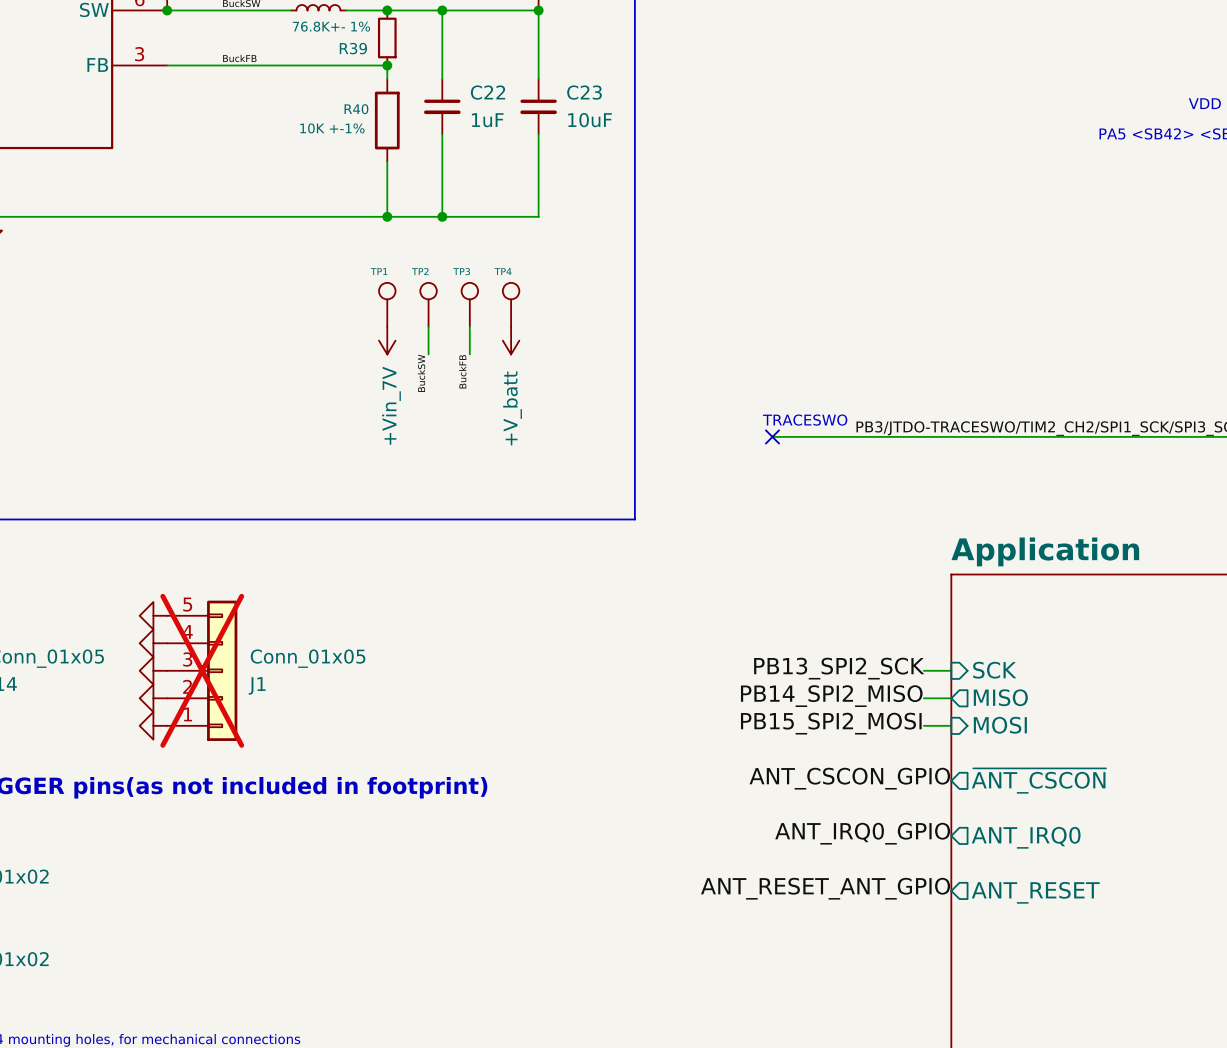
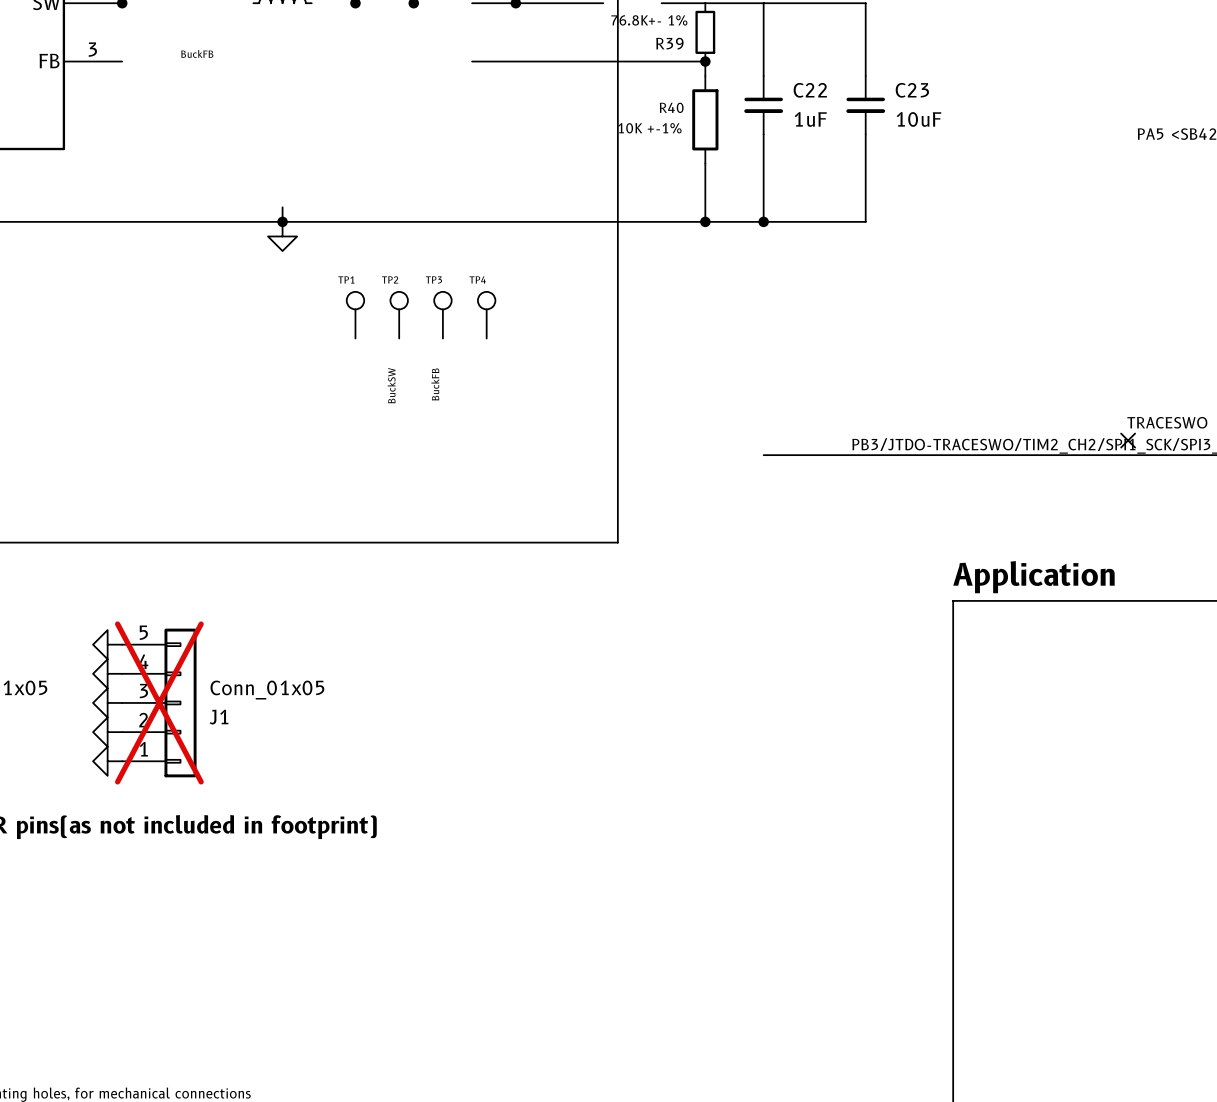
wire: (167, 10) (290, 10) -> none
wire: (346, 10) (497, 10) -> none
wire: (442, 10) (442, 79) -> none
wire: (538, 10) (538, 79) -> (515, 3) (603, 3)
wire: none -> (661, 3) (865, 3) (865, 76)
wire: none -> (763, 3) (763, 76)
R39 position: (387, 37) -> (705, 32)
wire: (167, 65) (387, 65) (387, 79) -> none
junction: (387, 65) -> none
wire: none -> (472, 61) (705, 61) (705, 76)
junction: none -> (705, 61)
C22 position: (442, 106) -> (763, 105)
C23 position: (538, 106) -> (865, 105)
R40 position: (387, 120) -> (705, 119)
wire: (442, 134) (442, 216) -> none
wire: (538, 134) (538, 216) -> (865, 134) (865, 221) (515, 221)
wire: none -> (763, 134) (763, 221)
wire: (387, 161) (387, 216) -> none
wire: none -> (705, 163) (705, 221)
wire: none -> (282, 207) (282, 221)
junction: none -> (282, 221)
junction: (387, 216) -> none
junction: (442, 216) -> none
junction: none -> (705, 221)
junction: none -> (763, 221)
power symbol: none -> (282, 236)
wire: (428, 326) (428, 354) -> none
wire: (469, 326) (469, 354) -> none
power symbol: +Vin_7V (387, 340) -> none
power symbol: +V_batt (511, 340) -> none
text: none -> TRACESWO (1167, 422)
text: TRACESWO (805, 420) -> none
no-connect mark: none -> (1128, 440)
no-connect mark: (772, 436) -> none
label: PB13_SPI2_SCK (839, 668) -> none
wire: (923, 670) (951, 670) -> none
sheet pin: SCK (994, 670) -> none
label: PB14_SPI2_MISO (831, 696) -> none
sheet pin: MISO (1000, 697) -> none
wire: (923, 698) (951, 698) -> none
label: PB15_SPI2_MOSI (831, 723) -> none
wire: (923, 725) (951, 725) -> none
sheet pin: MOSI (1000, 725) -> none
label: ANT_CSCON_GPIO (849, 778) -> none
sheet pin: ~{ANT_CSCON} (1038, 781) -> none
label: ANT_IRQ0_GPIO (862, 833) -> none
sheet pin: ANT_IRQ0 (1026, 837) -> none
label: ANT_RESET_ANT_GPIO (825, 888) -> none
sheet pin: ANT_RESET (1035, 892) -> none

